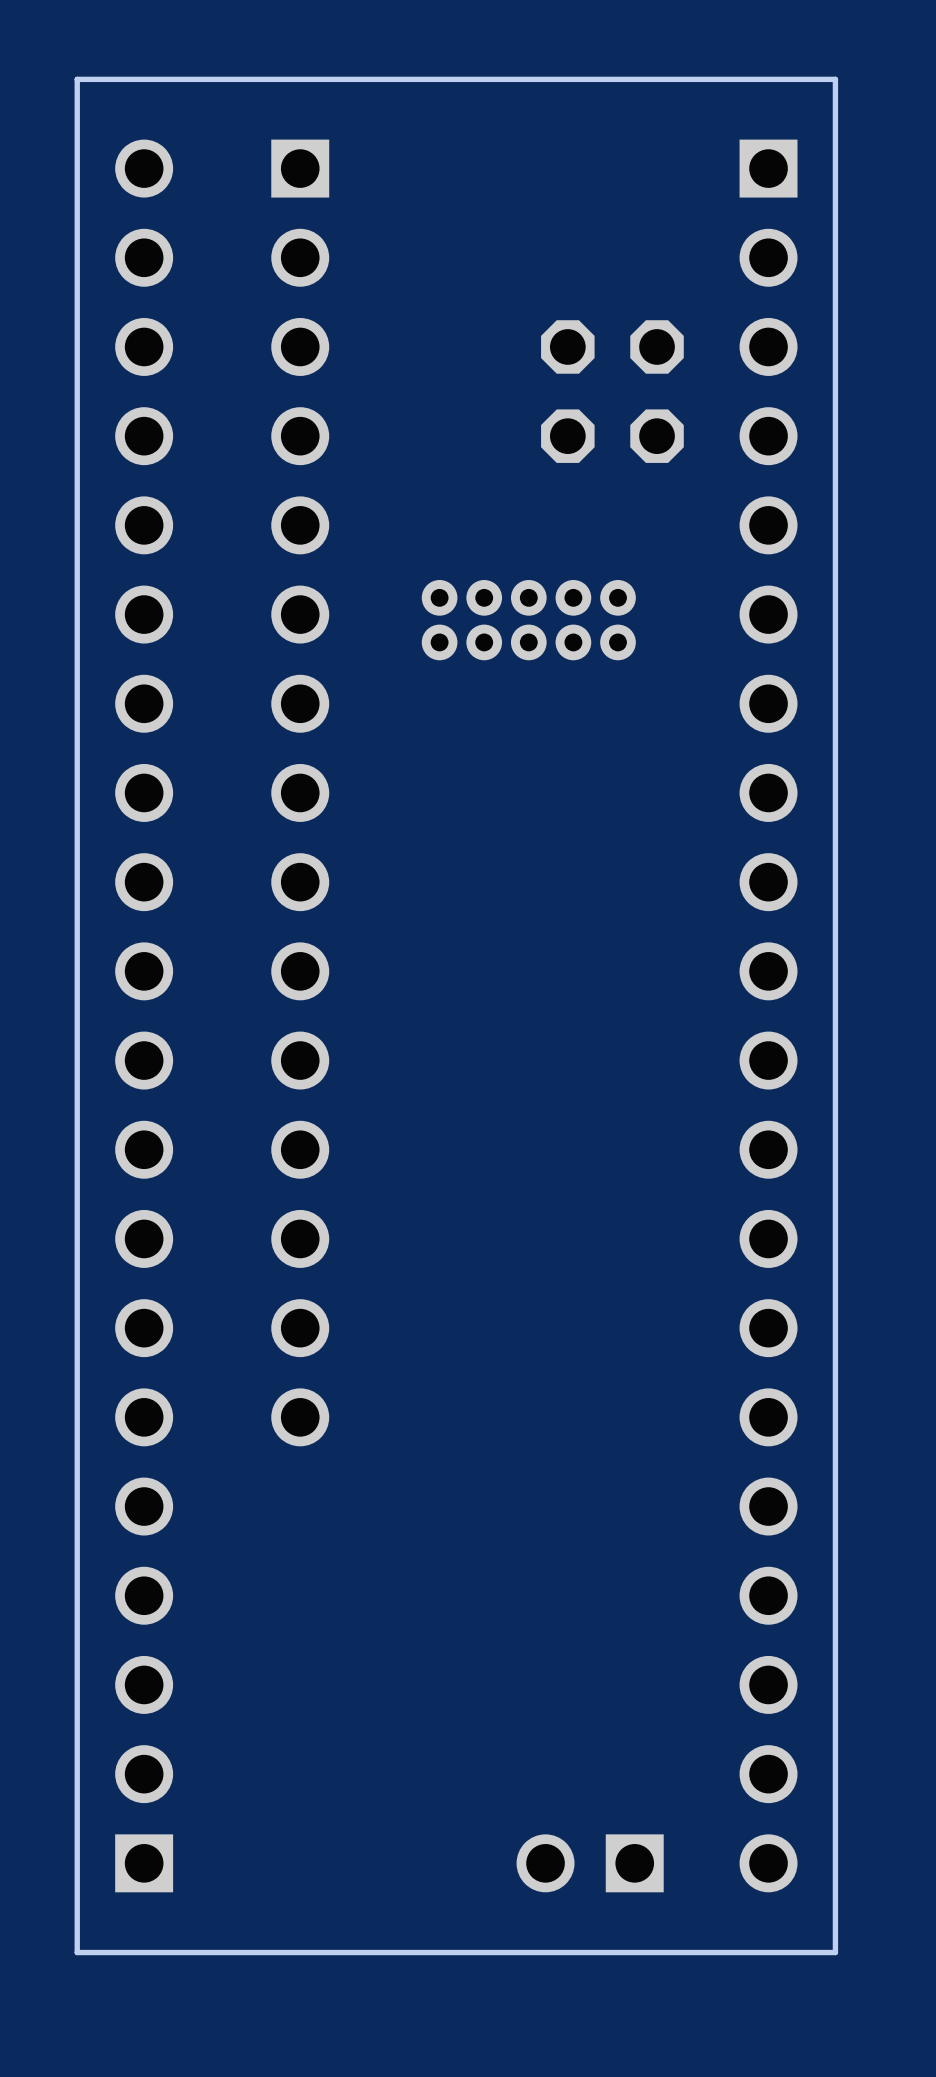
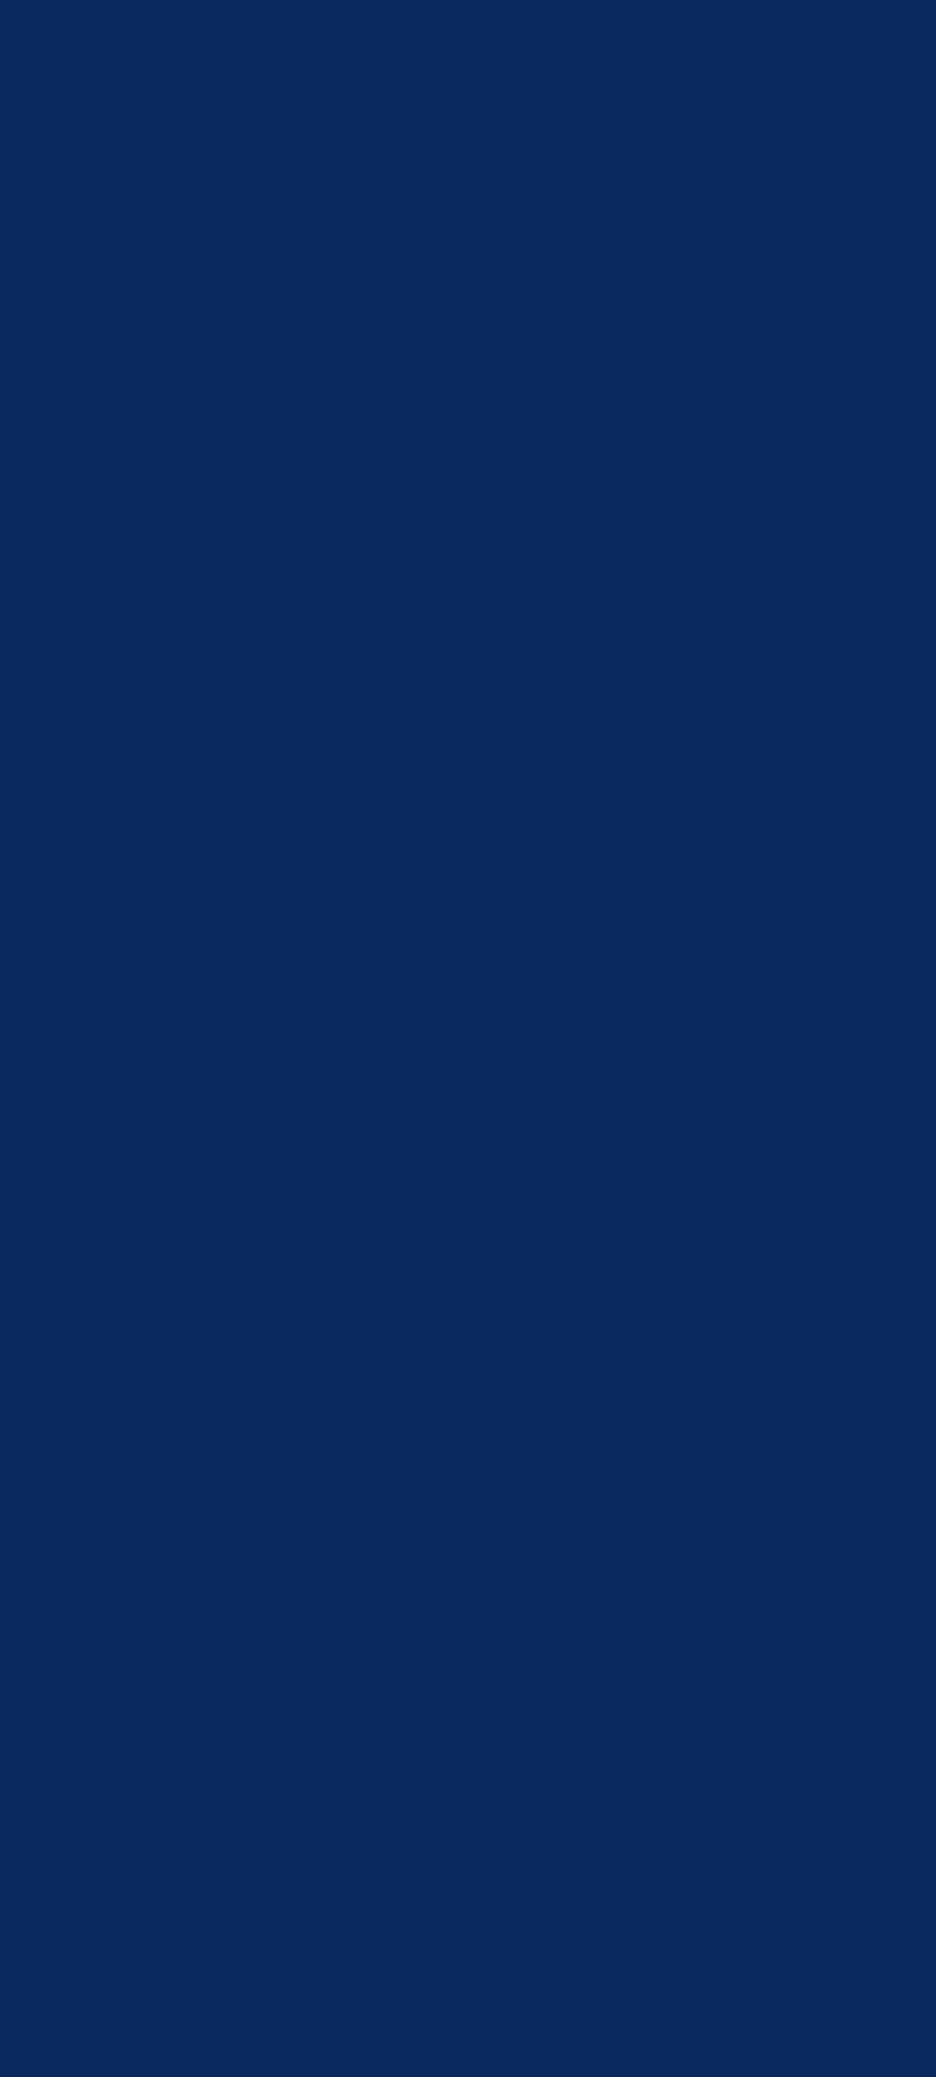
board edge: (835, 79) (835, 1952) (77, 1952) (77, 79) (835, 79) -> none
part: (612, 391) -> none
part: (528, 620) -> none
part: (300, 792) -> none
part: (144, 1015) -> none
part: (768, 1015) -> none
part: (590, 1863) -> none

